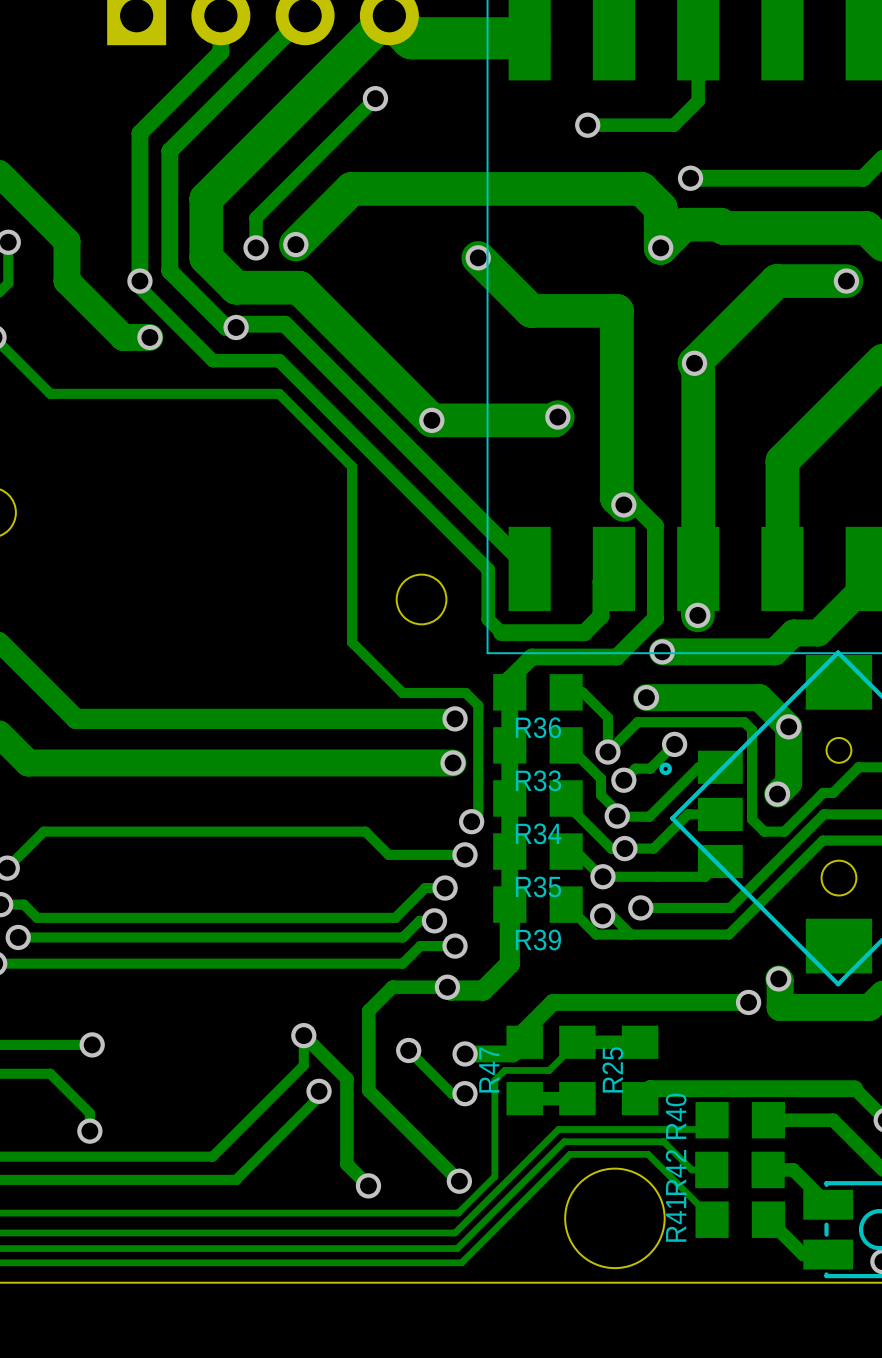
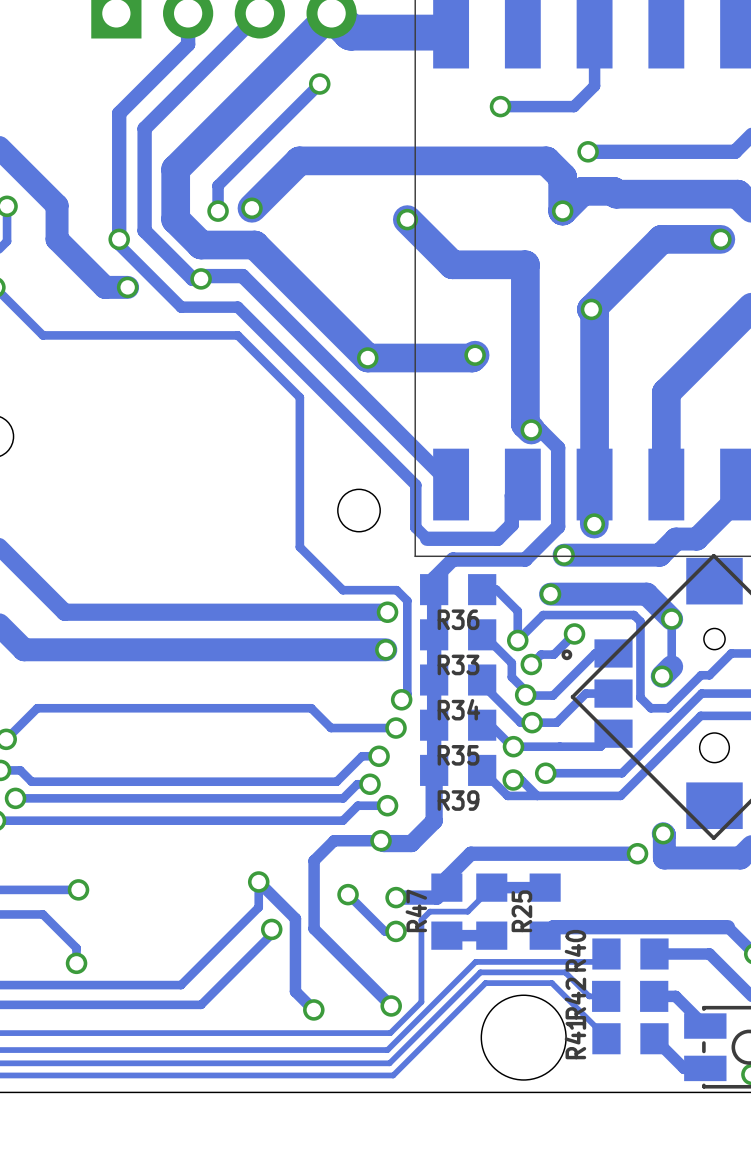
track width: thick (788, 726) (788, 782) -> thin (671, 619) (671, 666)

